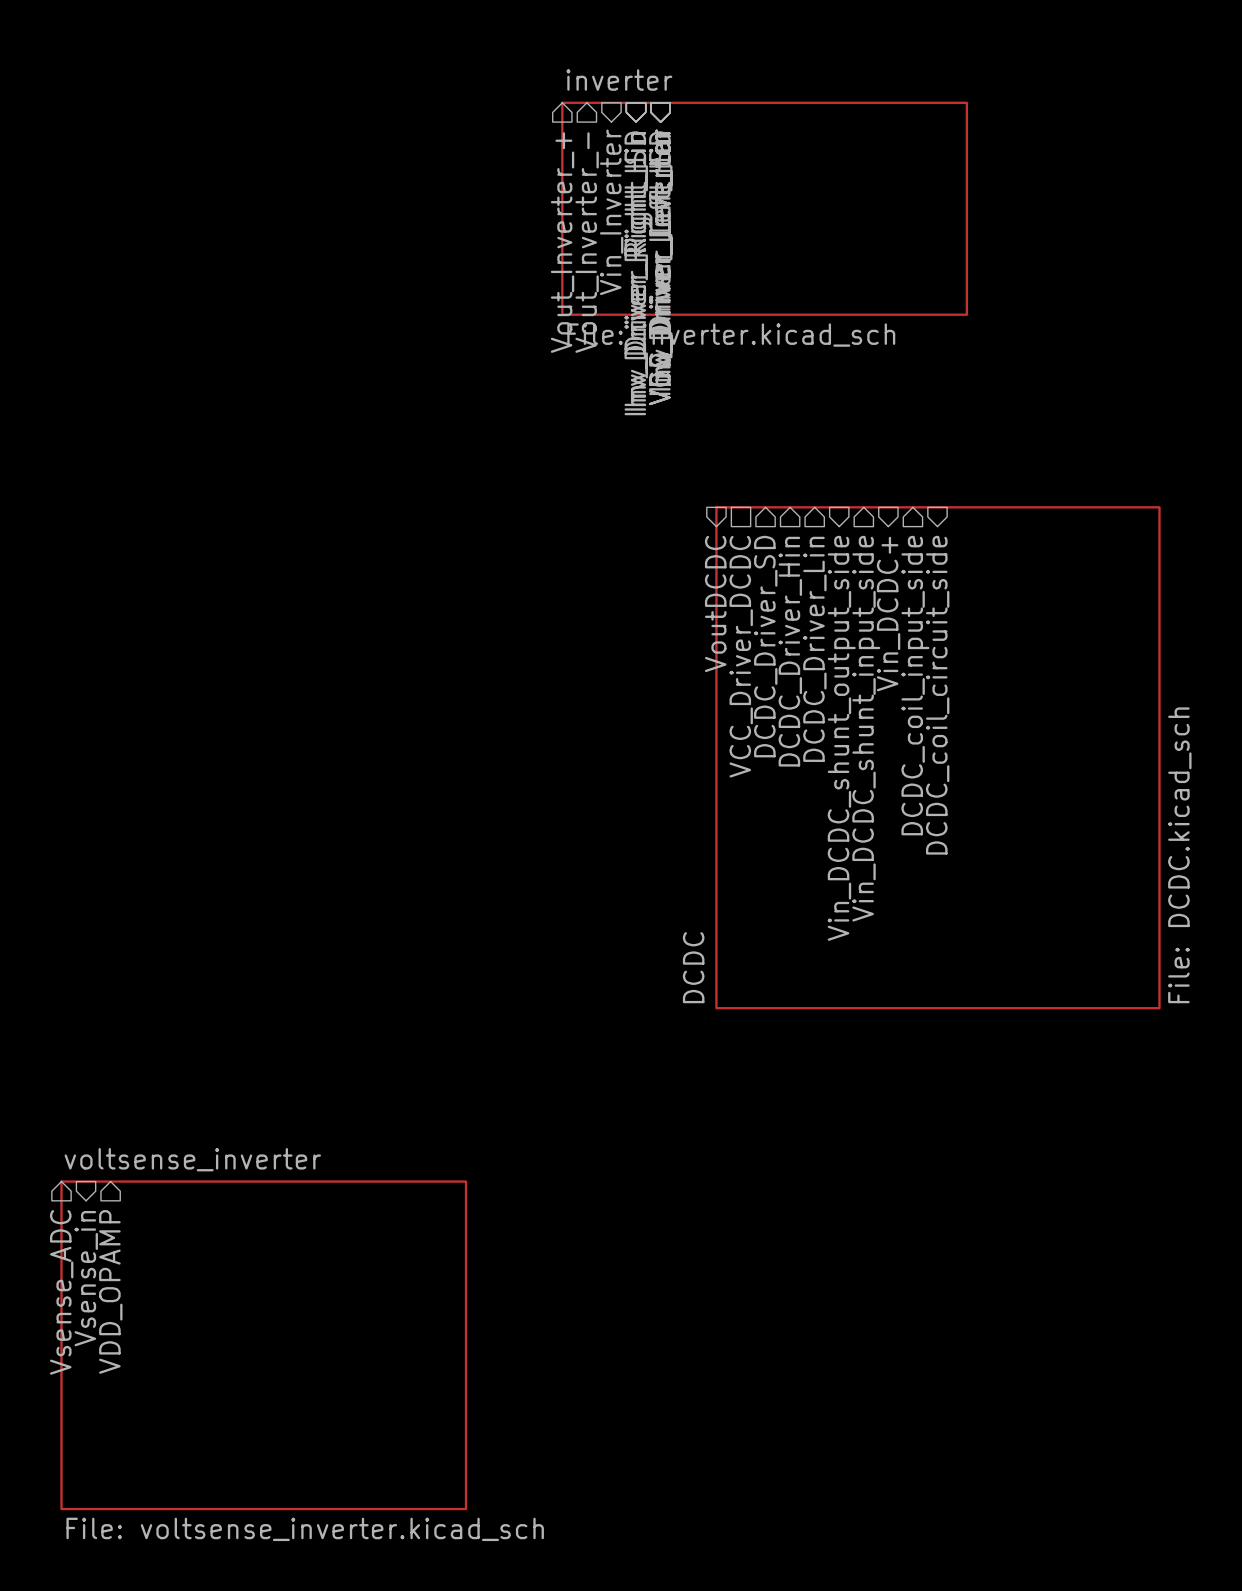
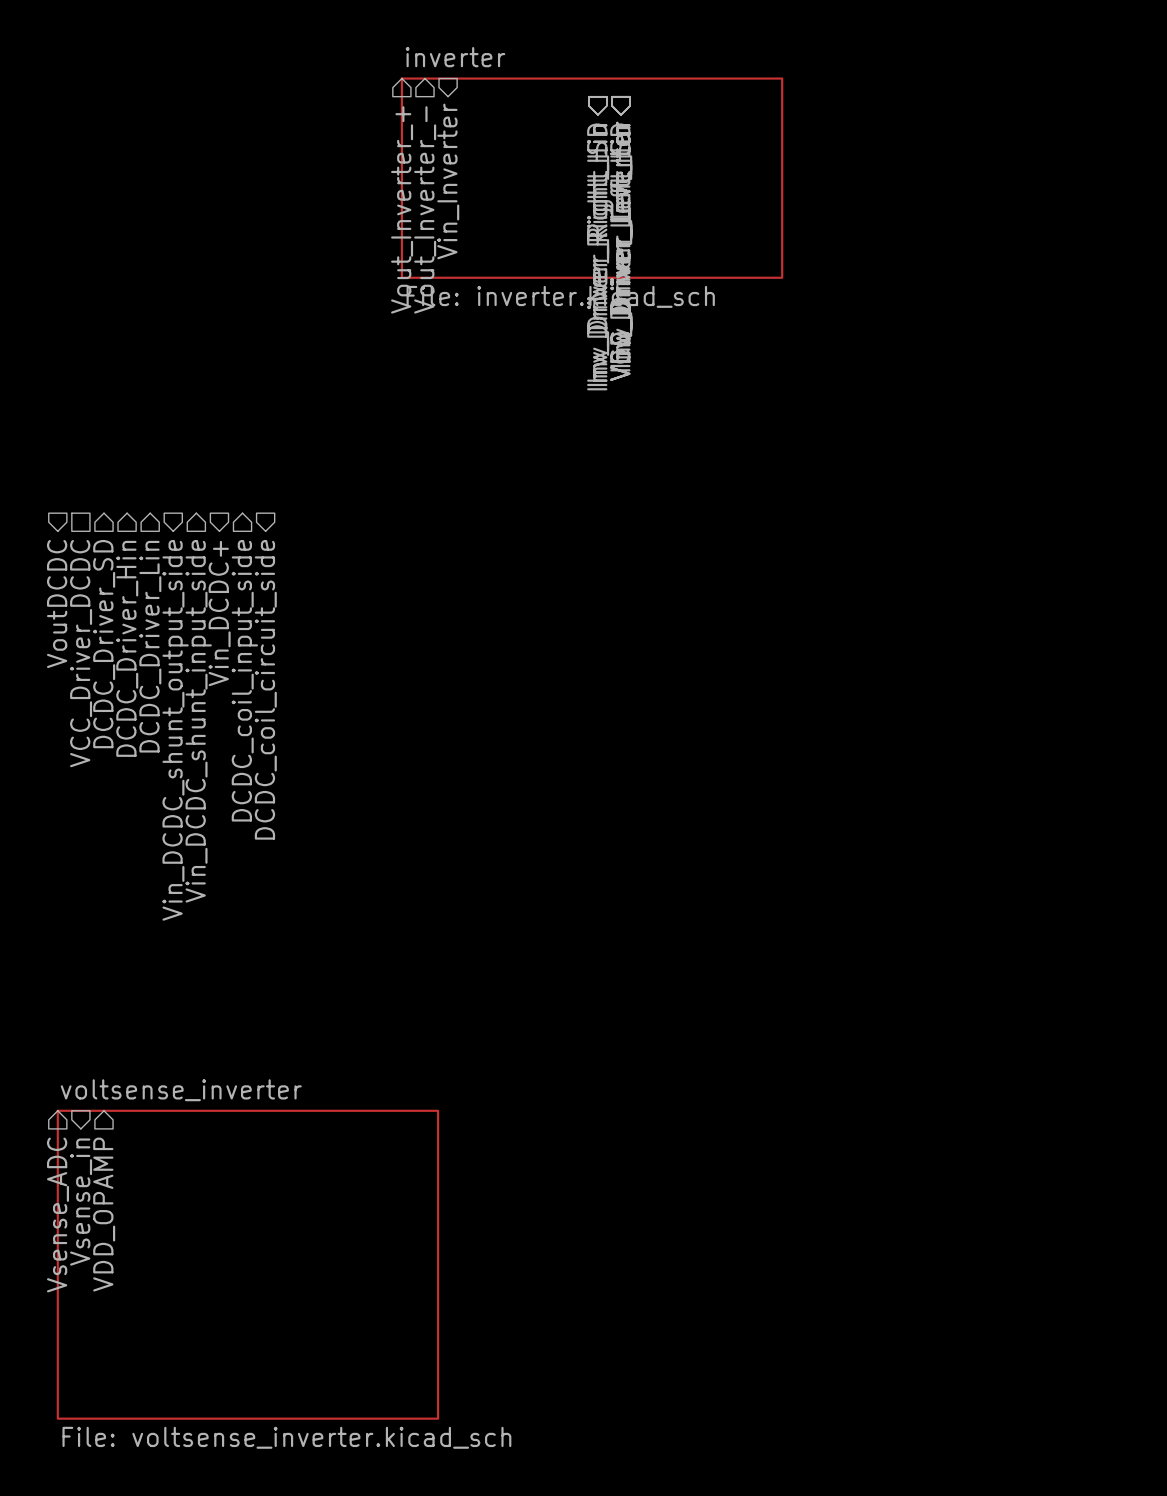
sheet inverter position: (764, 208) -> (592, 178)
sheet pin position: Vin_Inverter (611, 212) -> Vin_Inverter (448, 181)
sheet pin position: Vout_Inverter_+ (562, 242) -> Vout_Inverter_+ (402, 209)
sheet pin position: Vout_Inverter_- (587, 242) -> Vout_Inverter_- (425, 209)
sheet pin: VoutDCDC (715, 603) -> none
sheet pin: Vin_DCDC+ (888, 614) -> none
sheet pin: none -> VoutDCDC (57, 604)
sheet pin: DCDC_Driver_SD (765, 646) -> none
sheet pin: DCDC_Driver_Lin (814, 649) -> none
sheet pin: DCDC_Driver_Hin (790, 651) -> none
sheet pin: none -> Vin_DCDC+ (219, 613)
sheet pin: VCC_Driver_DCDC (741, 656) -> none
sheet pin: none -> DCDC_Driver_SD (104, 644)
sheet pin: DCDC_coil_input_side (915, 685) -> none
sheet pin: none -> DCDC_Driver_Lin (150, 646)
sheet pin: none -> DCDC_Driver_Hin (127, 648)
sheet pin: none -> VCC_Driver_DCDC (81, 653)
sheet pin: DCDC_coil_circuit_side (937, 695) -> none
sheet pin: none -> DCDC_coil_input_side (244, 680)
sheet pin: Vin_DCDC_shunt_input_side (866, 728) -> none
sheet pin: none -> DCDC_coil_circuit_side (265, 689)
sheet pin: Vin_DCDC_shunt_output_side (841, 738) -> none
sheet DCDC: File: DCDC.kicad_sch (937, 757) -> none
sheet pin: none -> Vin_DCDC_shunt_input_side (198, 721)
sheet pin: none -> Vin_DCDC_shunt_output_side (175, 730)

